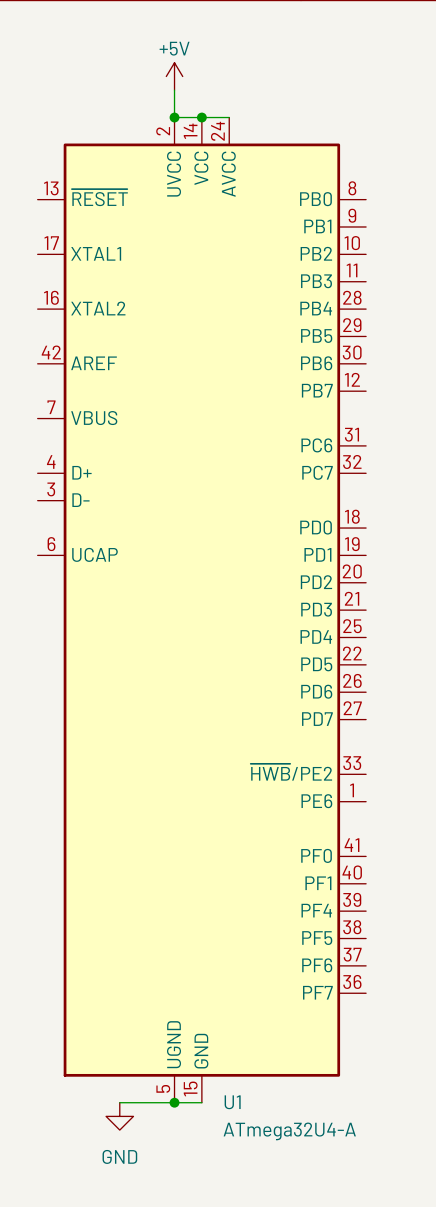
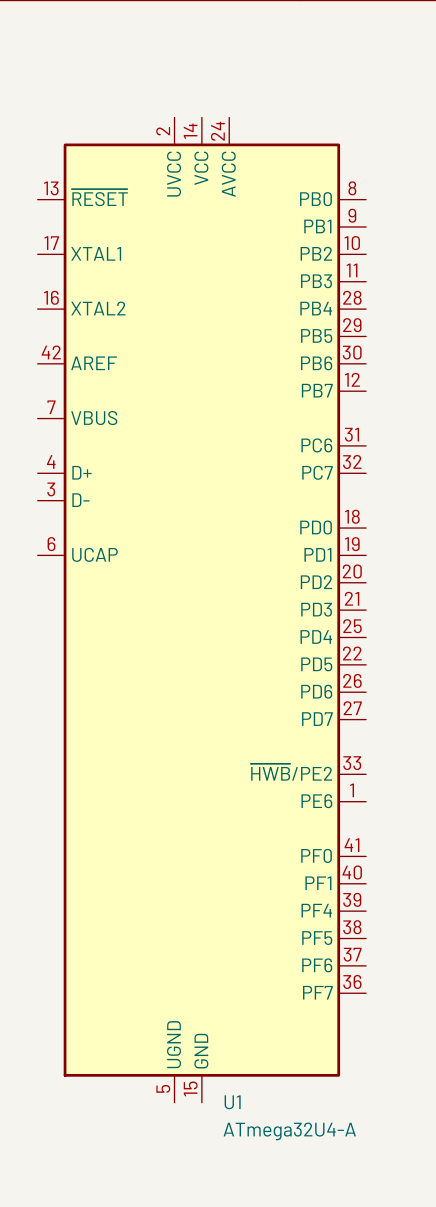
power symbol: +5V (174, 76) -> none
wire: (174, 90) (174, 117) (229, 117) -> none
junction: (174, 117) -> none
junction: (201, 117) -> none
wire: (119, 1102) (201, 1102) -> none
junction: (174, 1102) -> none
power symbol: GND (119, 1116) -> none

